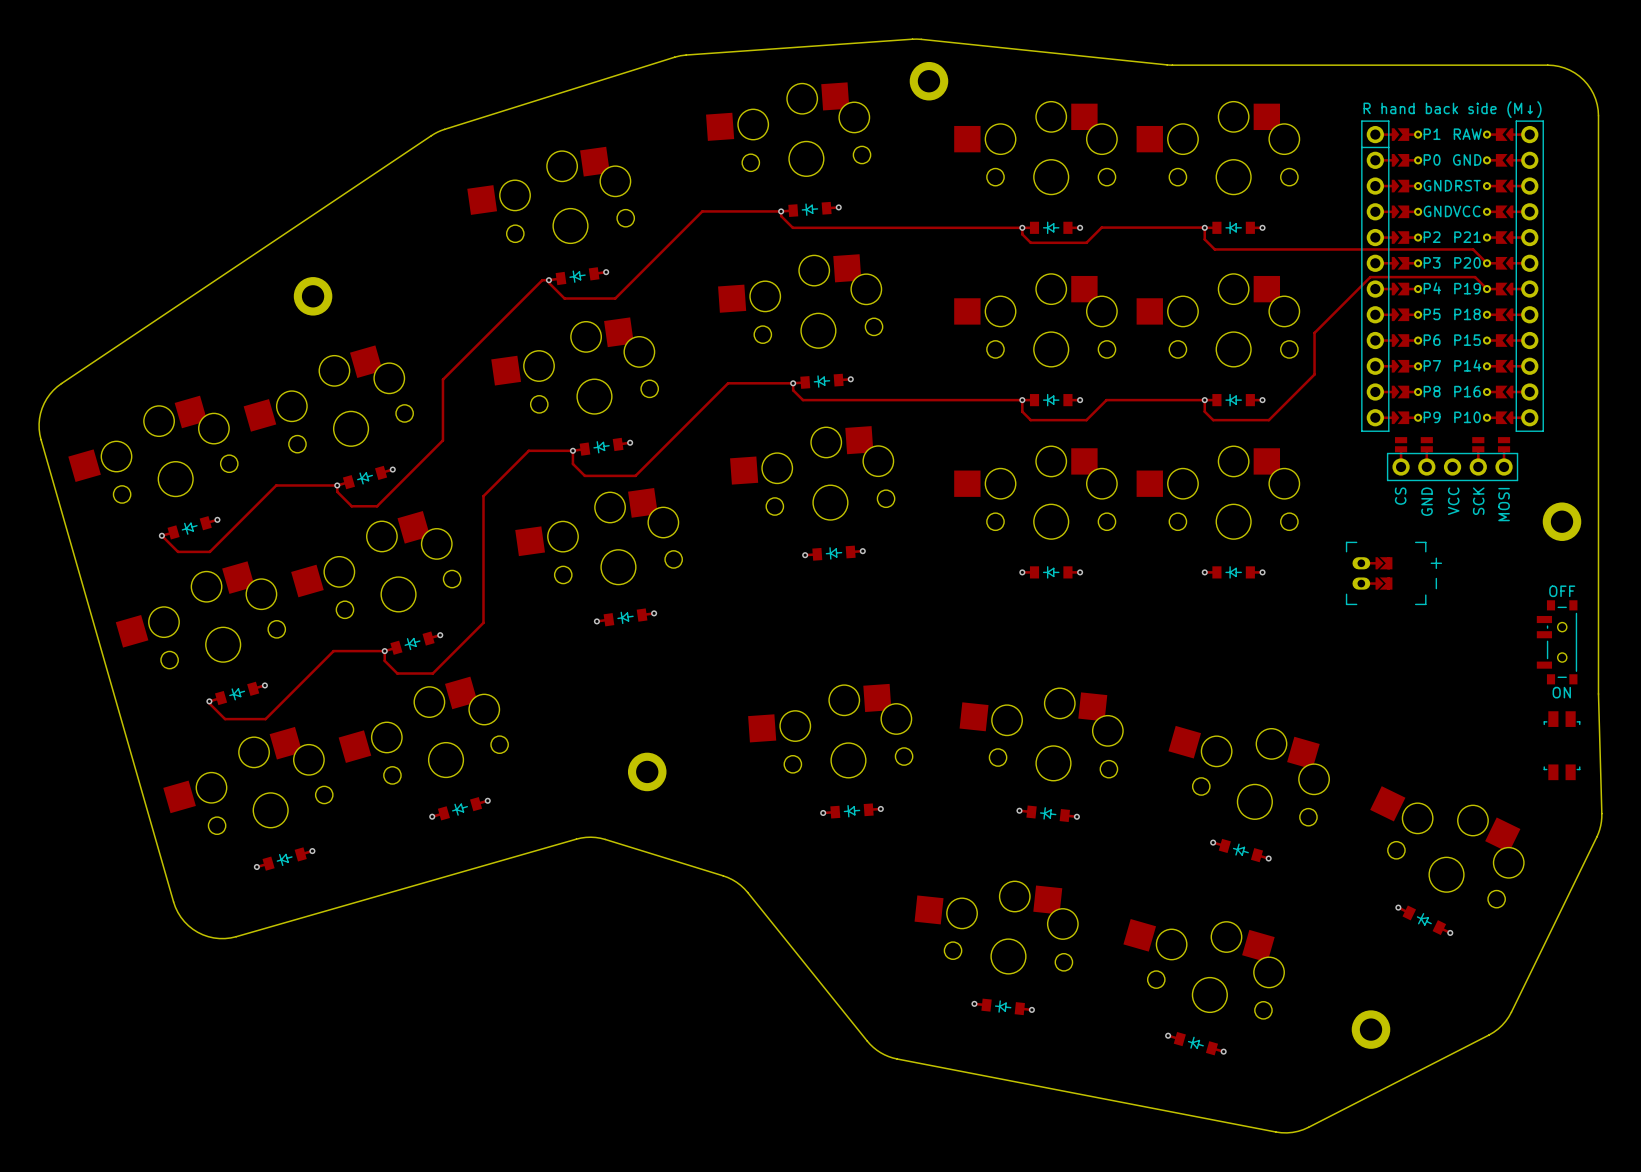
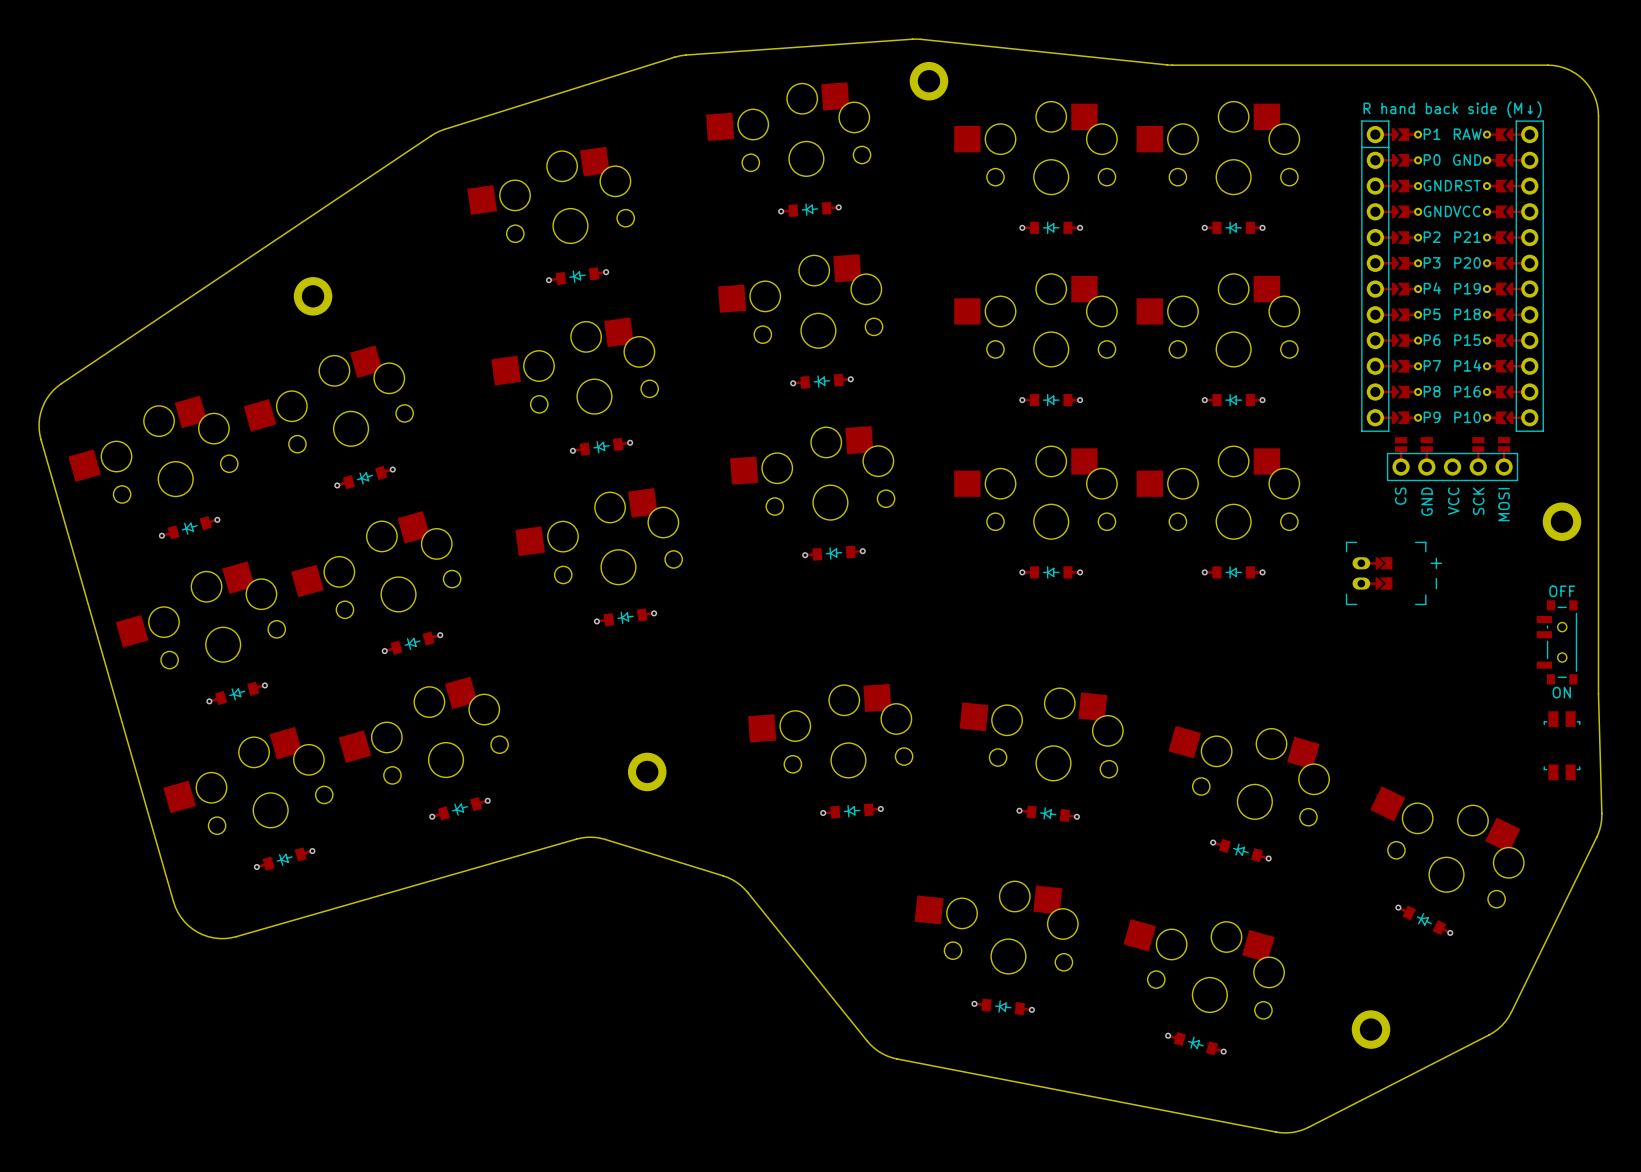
track: (1487, 263) (1473, 249) (1214, 249) (1204, 239) (1204, 227) (1101, 227) (1086, 242) (1030, 242) (1022, 234) (1022, 227) (792, 227) (781, 216) (781, 211) (702, 211) (615, 298) (564, 298) (548, 282) (548, 280) (542, 280) (442, 379) (442, 440) (377, 506) (351, 506) (337, 491) (337, 485) (276, 485) (209, 551) (178, 551) (161, 535) -> none
track: (1487, 289) (1475, 277) (1370, 277) (1314, 332) (1314, 374) (1268, 420) (1213, 420) (1204, 411) (1204, 400) (1106, 400) (1086, 420) (1030, 420) (1022, 411) (1022, 400) (802, 400) (793, 390) (793, 383) (728, 383) (635, 475) (584, 475) (572, 463) (572, 450) (528, 450) (483, 496) (483, 622) (432, 673) (397, 673) (384, 660) (384, 651) (333, 651) (265, 719) (225, 719) (209, 701) -> none

